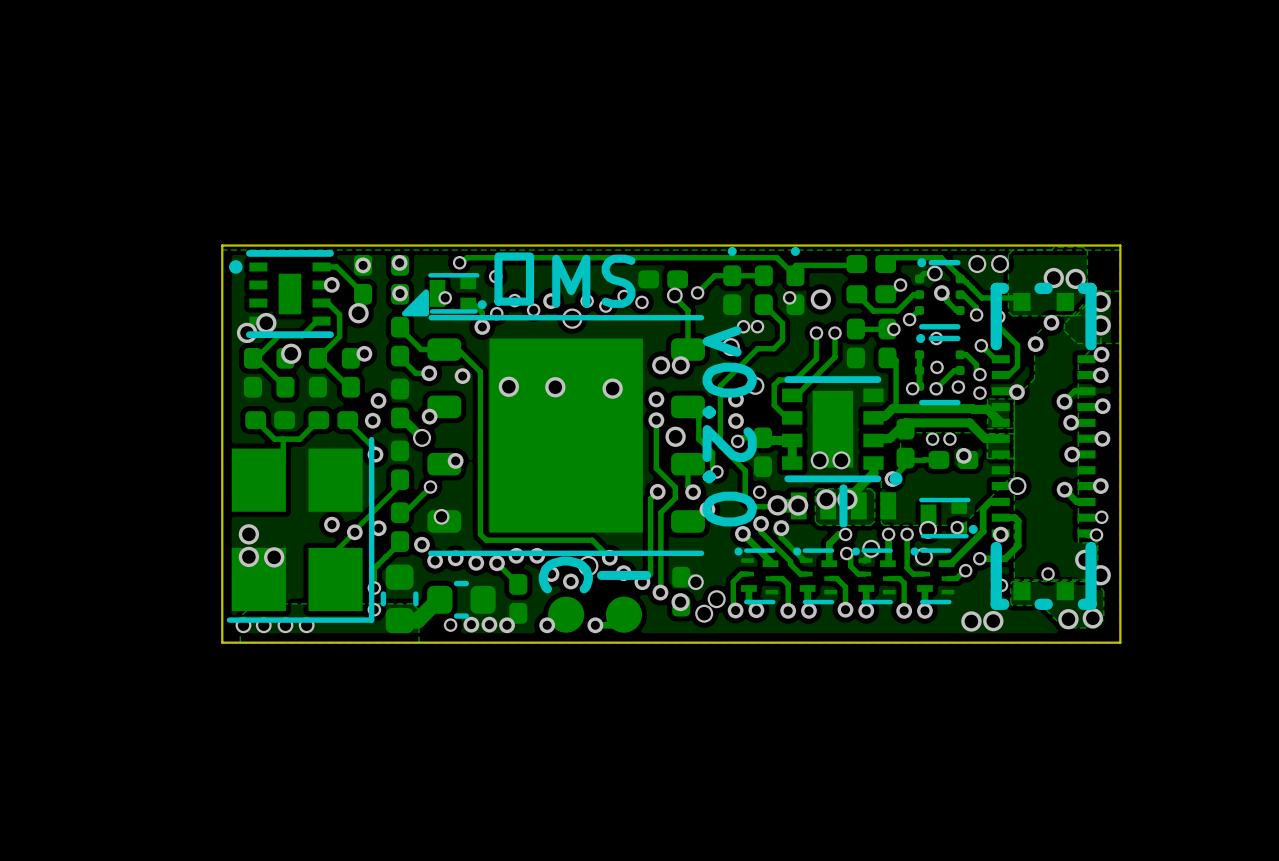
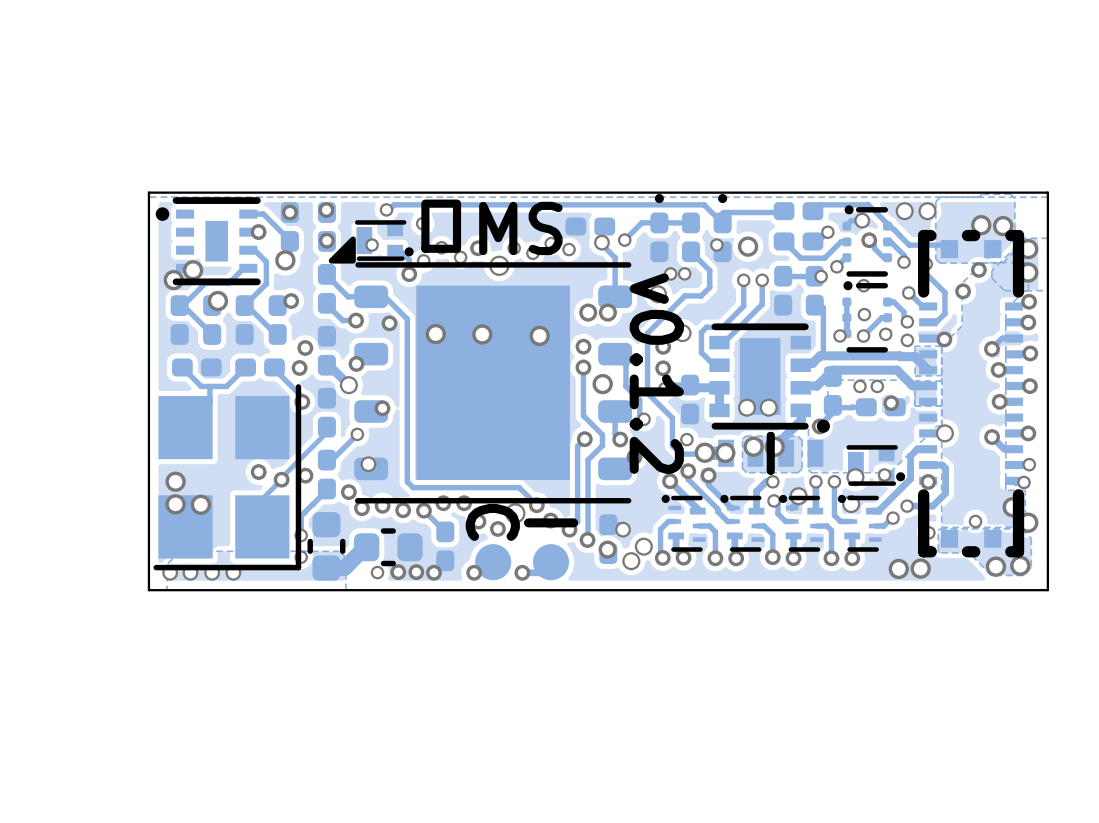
text: v0.2.0 (729, 426) -> v0.1.2 (656, 373)

